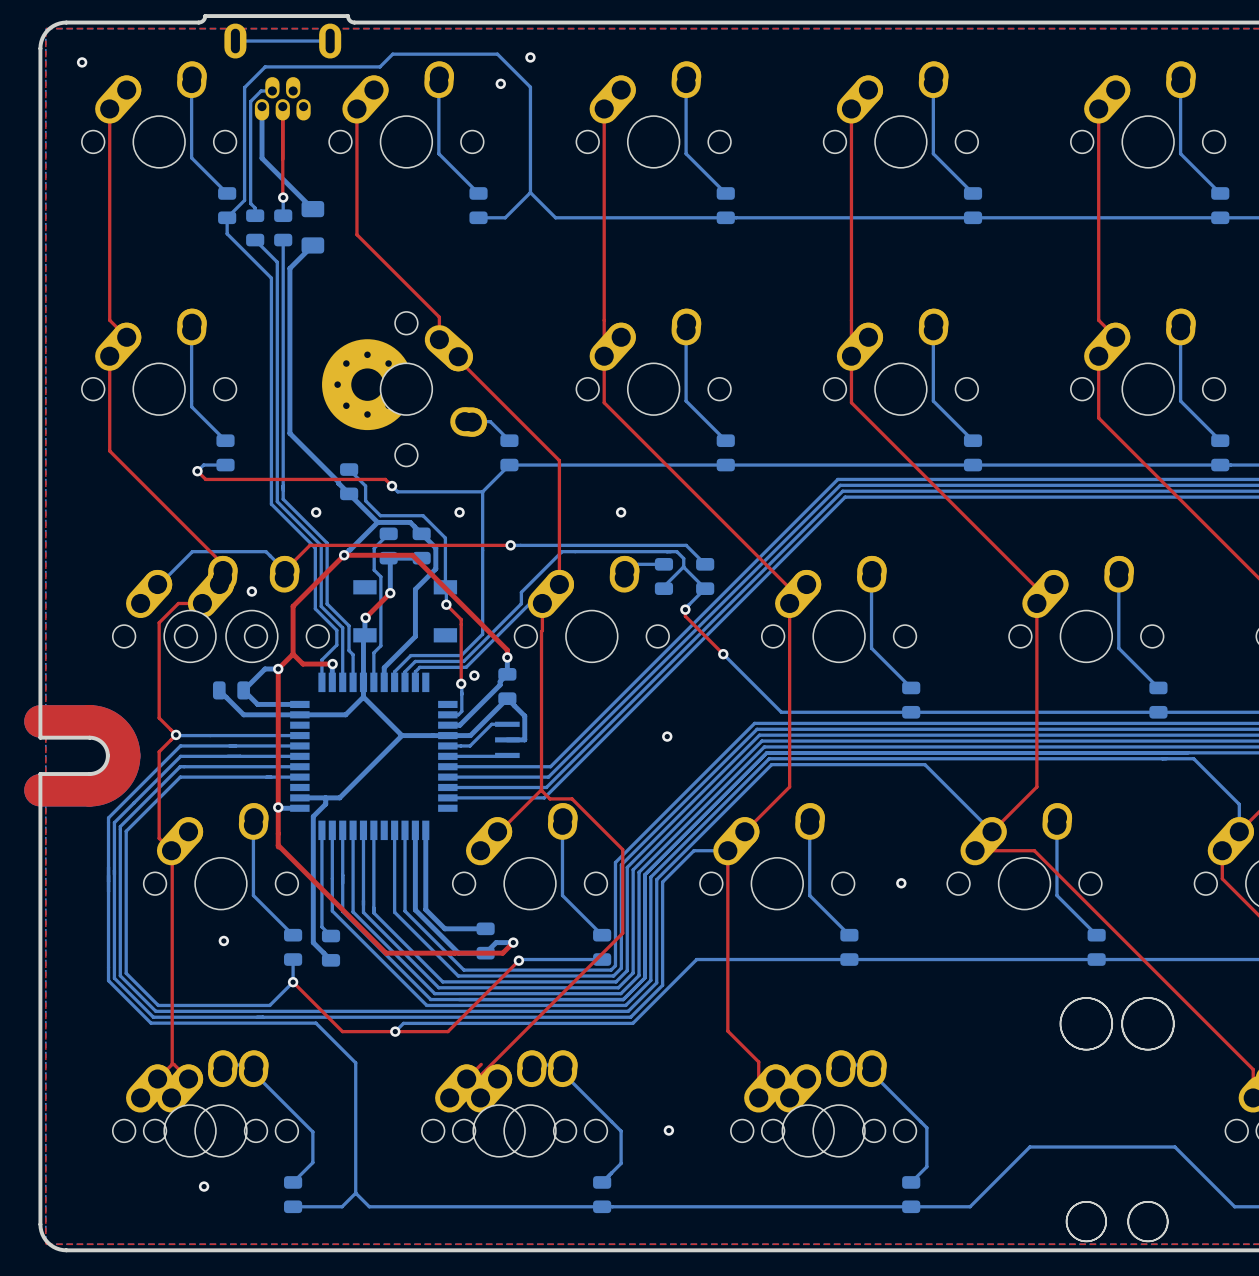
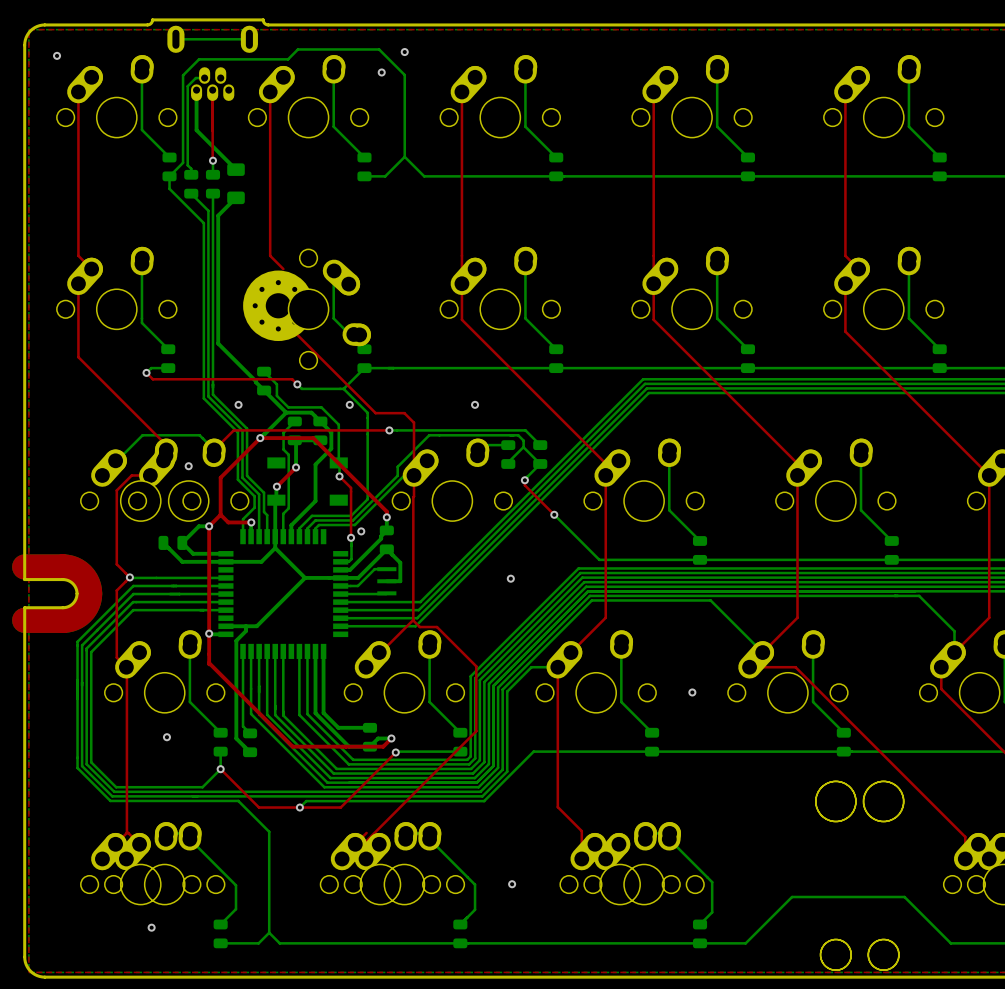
top track: (356, 234) (439, 317) (439, 339) -> (270, 189) (270, 255) (283, 269)
bottom track: none -> (333, 264) (333, 318) (364, 349)
top track: (439, 340) (559, 460) (559, 584) -> none
top track: none -> (270, 283) (270, 307) (375, 413) (404, 413) (414, 422) (414, 475)
bottom track: (464, 421) (490, 421) (509, 440) -> none
part position: (509, 452) -> (364, 358)
bottom track: (509, 465) (482, 491) -> (388, 368) (364, 368) (343, 388) (367, 412)
bottom track: (451, 491) (482, 491) -> none
bottom track: (482, 491) (482, 522) -> none

